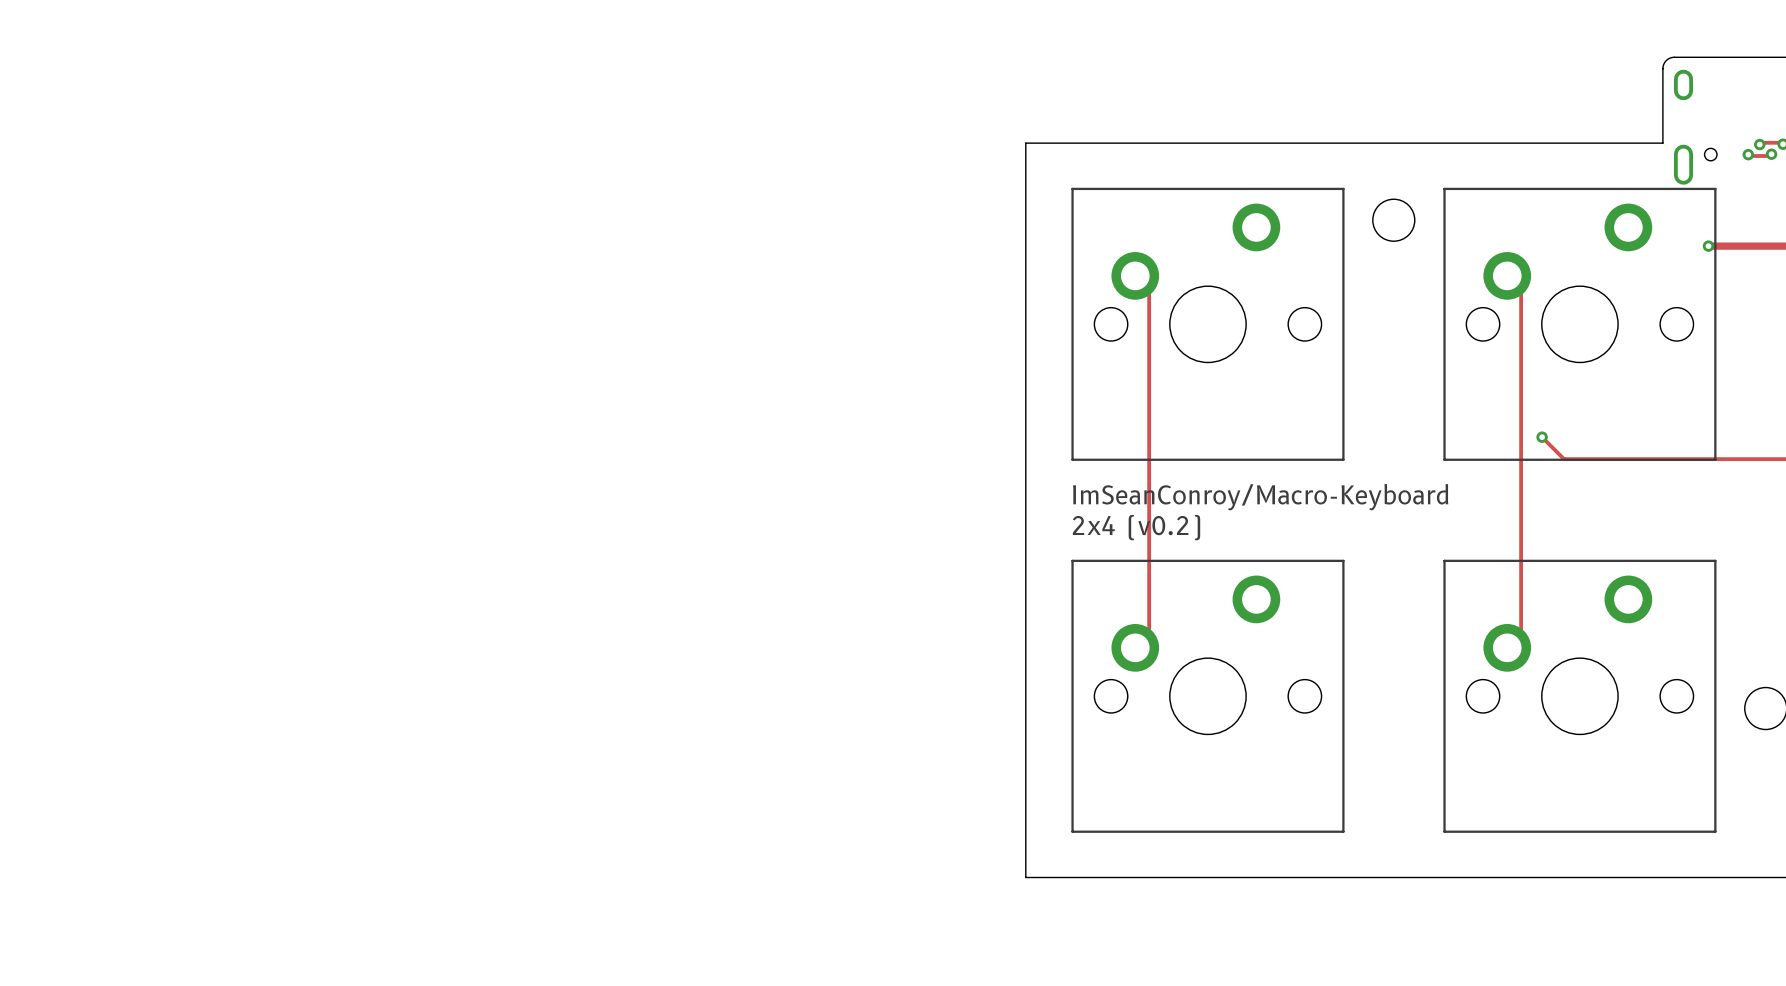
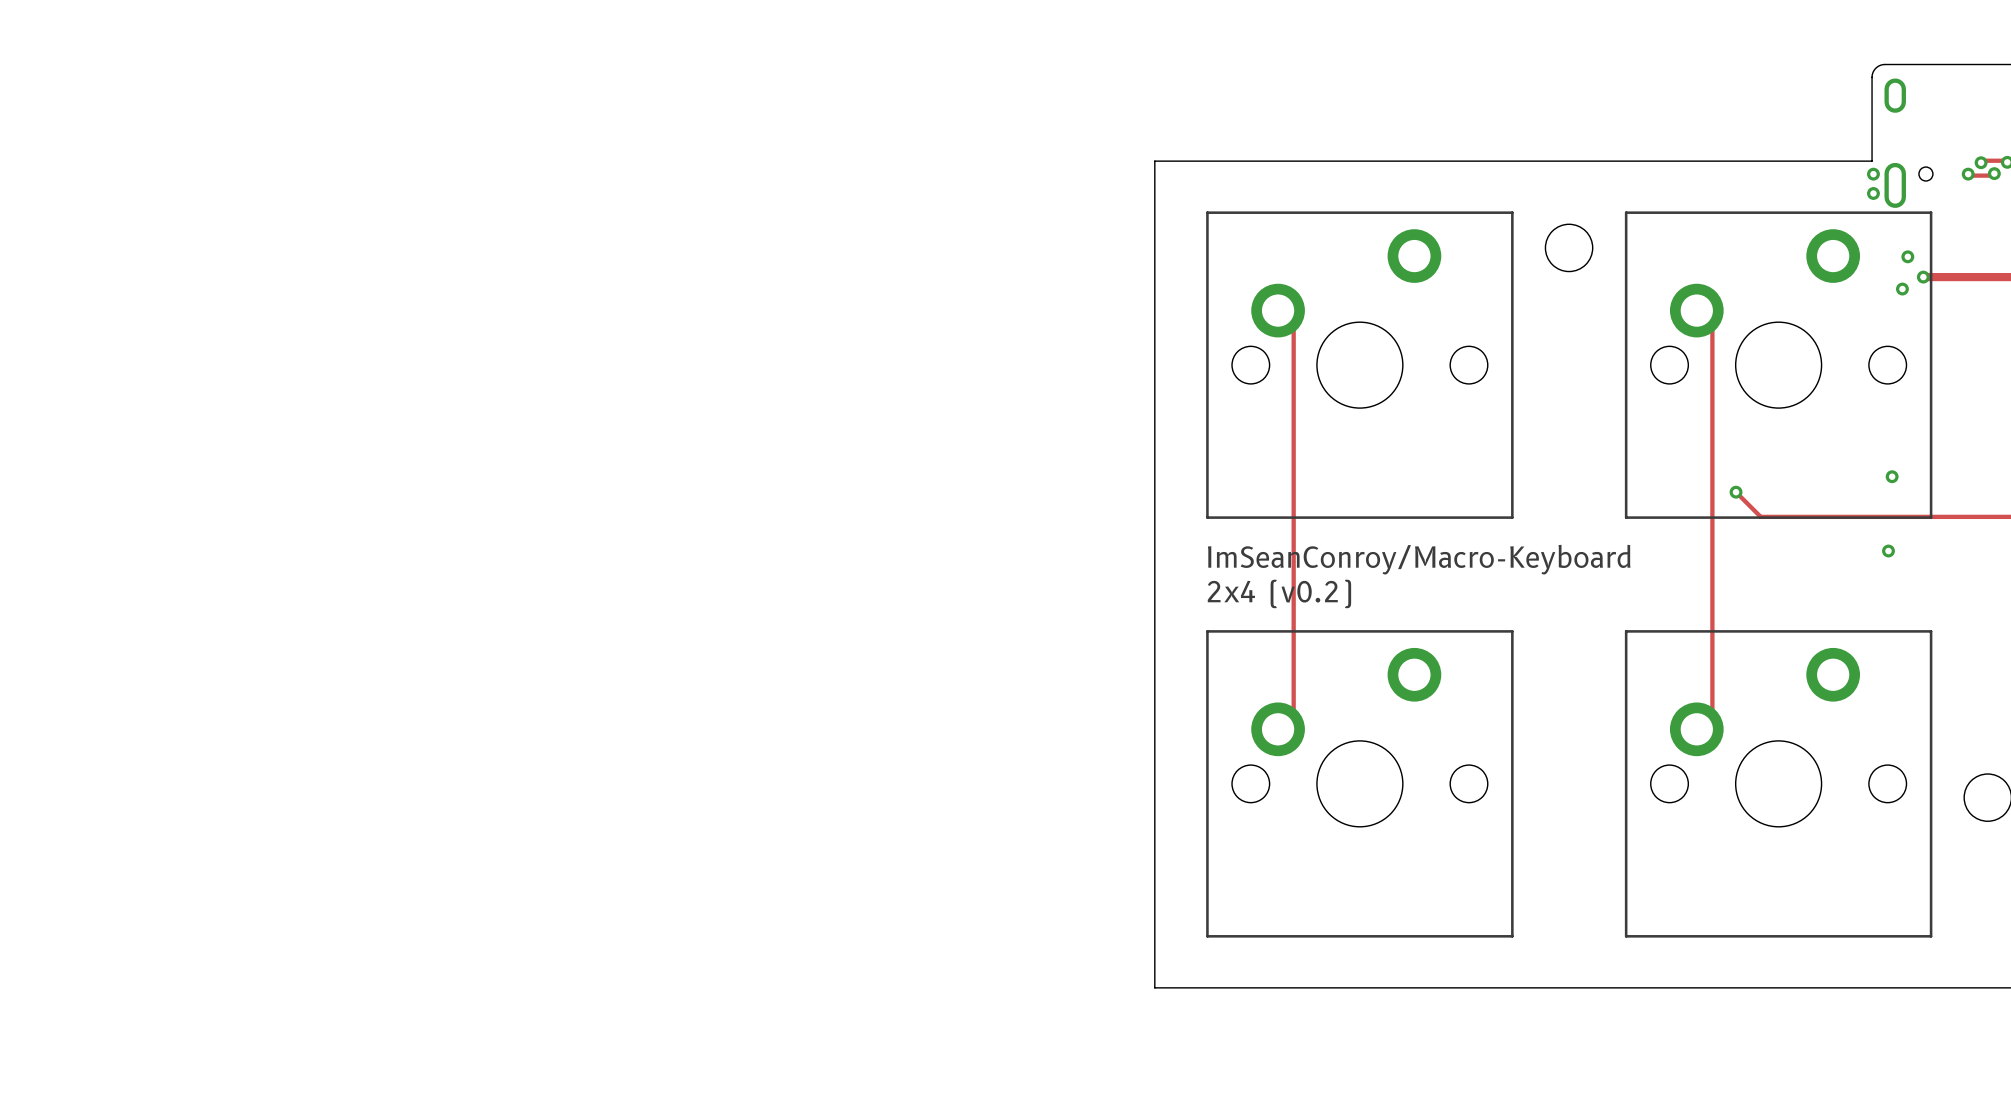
via: none -> (1873, 174)
via: none -> (1873, 193)
via: none -> (1907, 256)
via: none -> (1902, 289)
via: none -> (1892, 476)
via: none -> (1888, 551)

